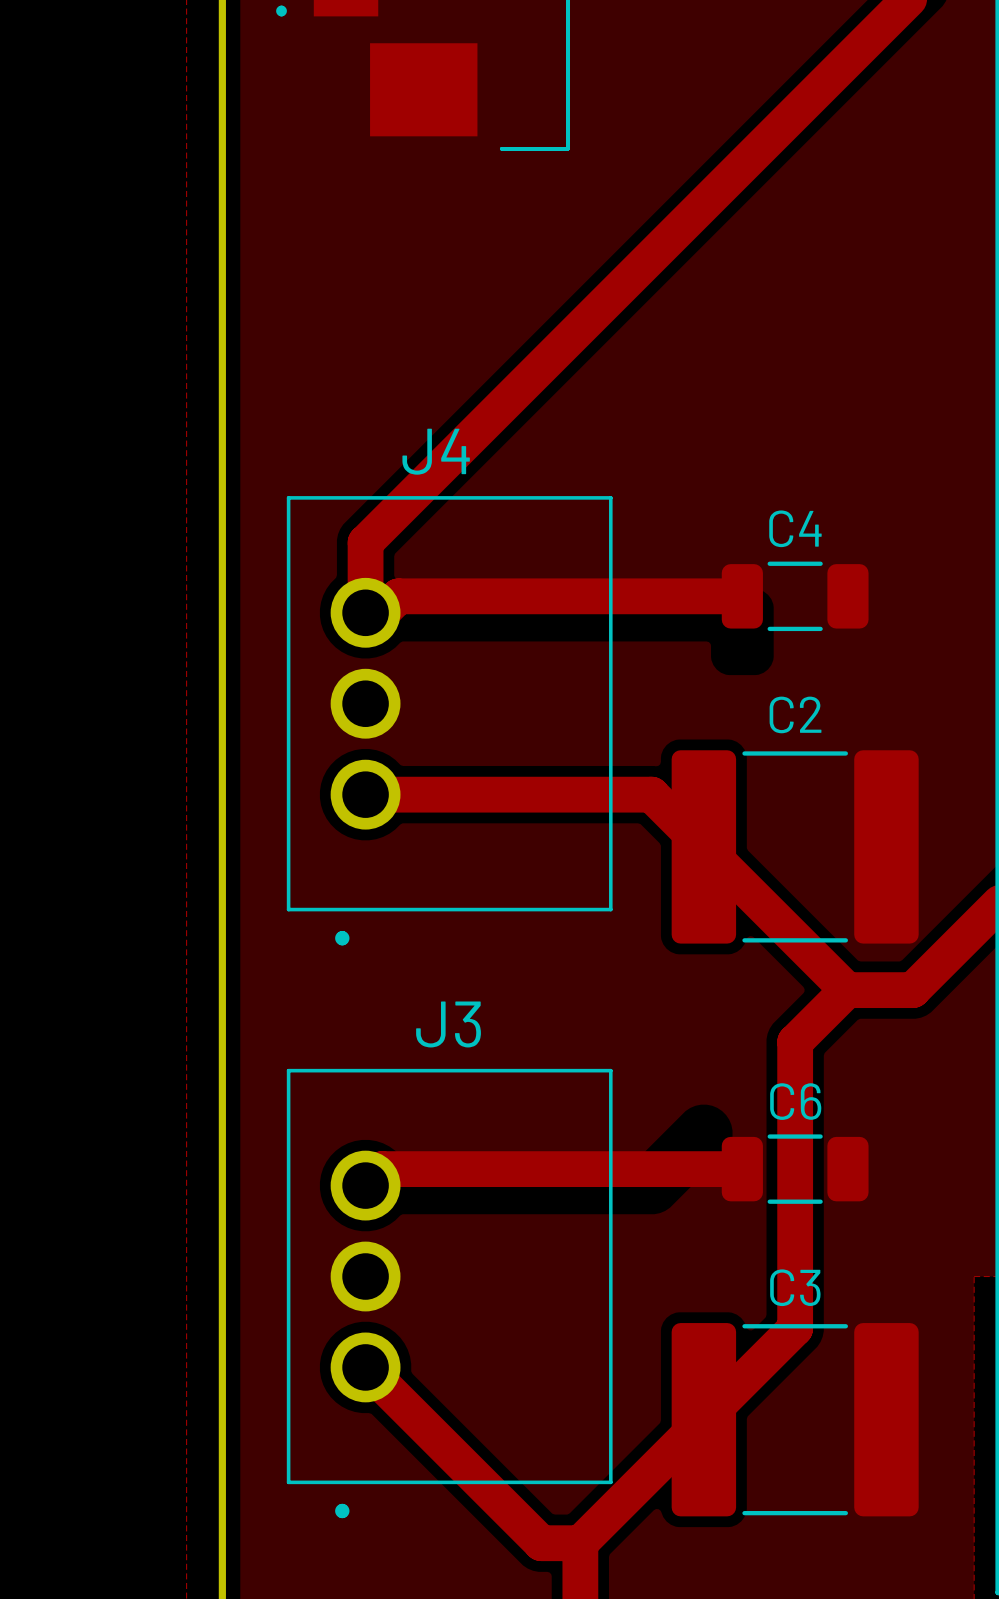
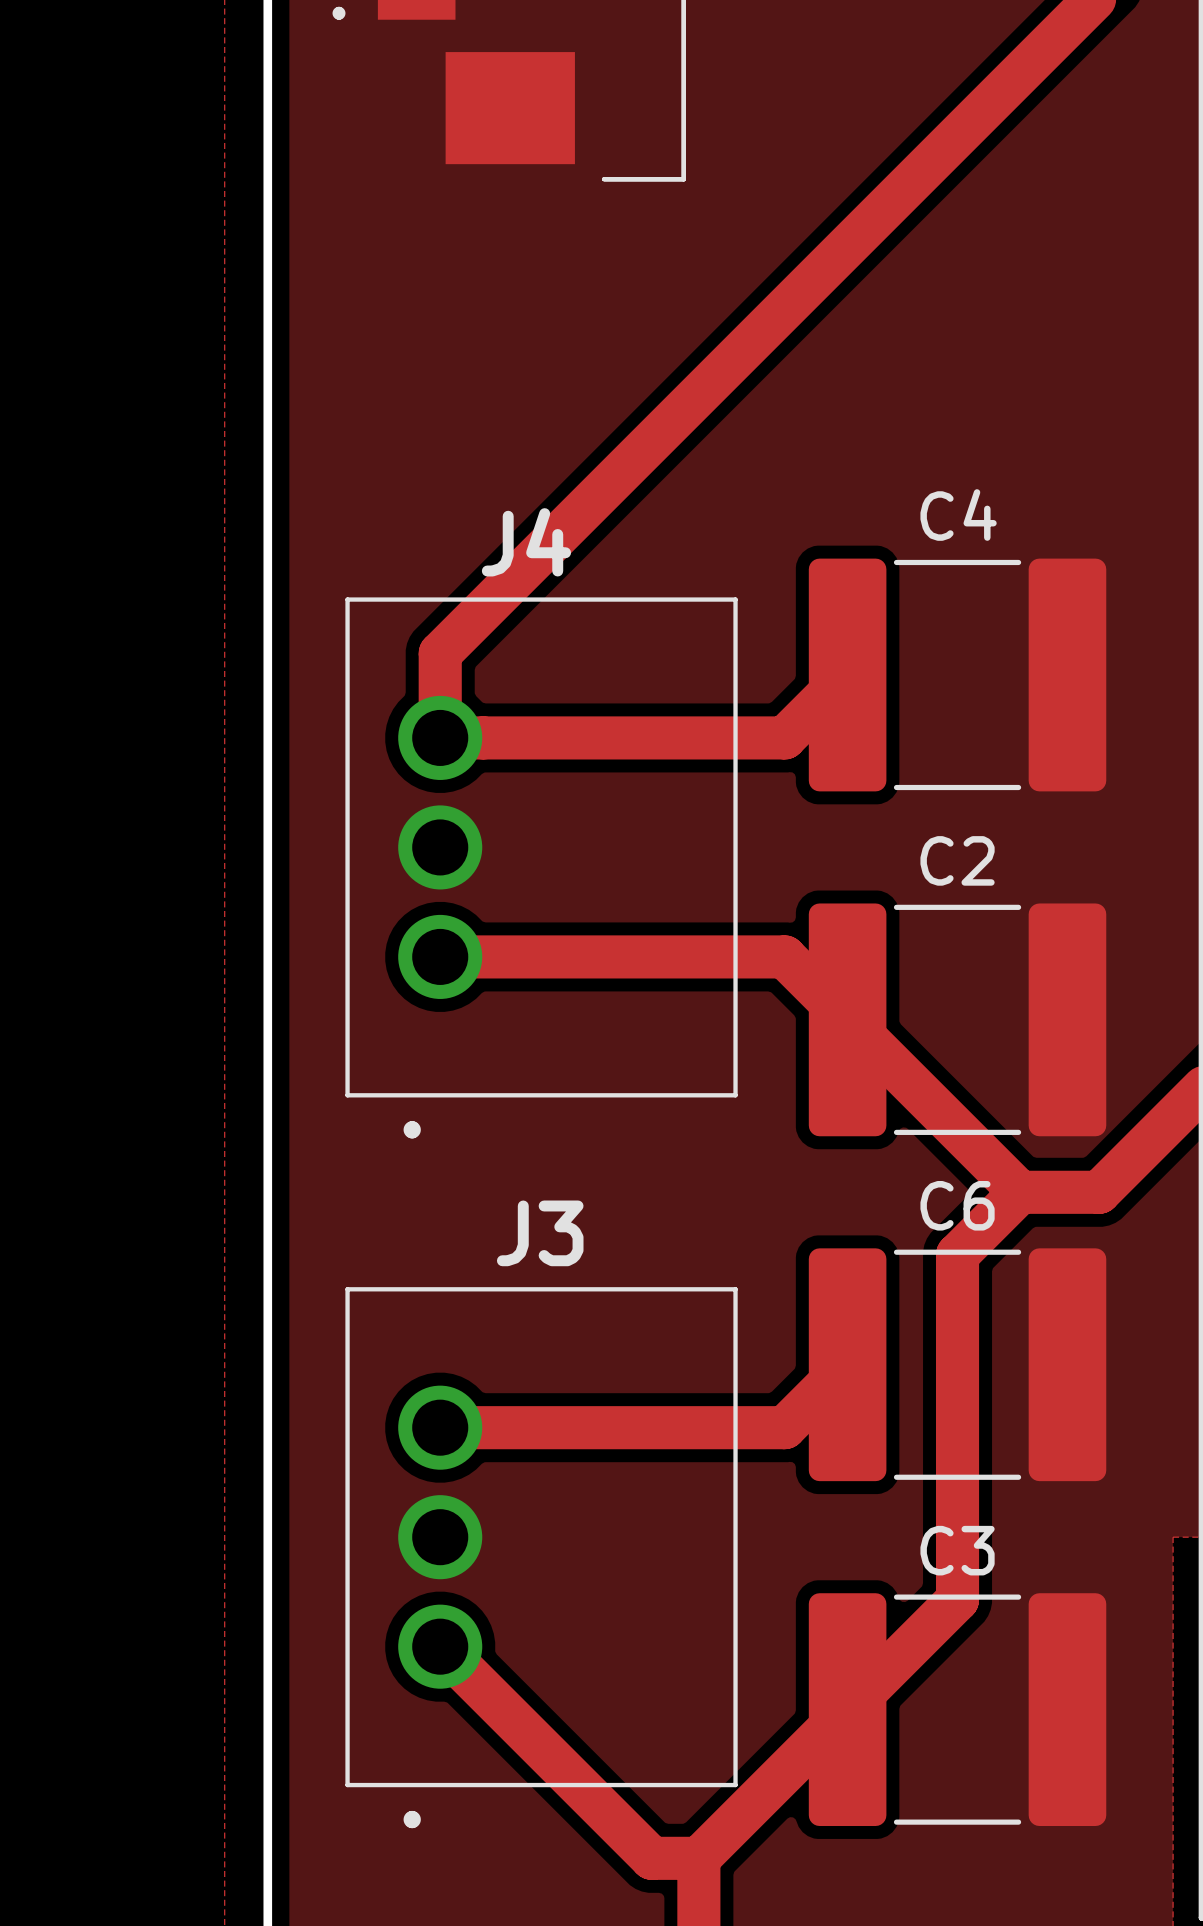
C4 footprint: [721, 561, 869, 632] -> [808, 558, 1107, 792]
track: (742, 596) (398, 596) (382, 612) -> (847, 674) (784, 737) (460, 737)
C6 footprint: [721, 1134, 869, 1204] -> [808, 1248, 1107, 1482]
track: (742, 1169) (382, 1169) (365, 1185) -> (847, 1364) (784, 1427) (440, 1427)

